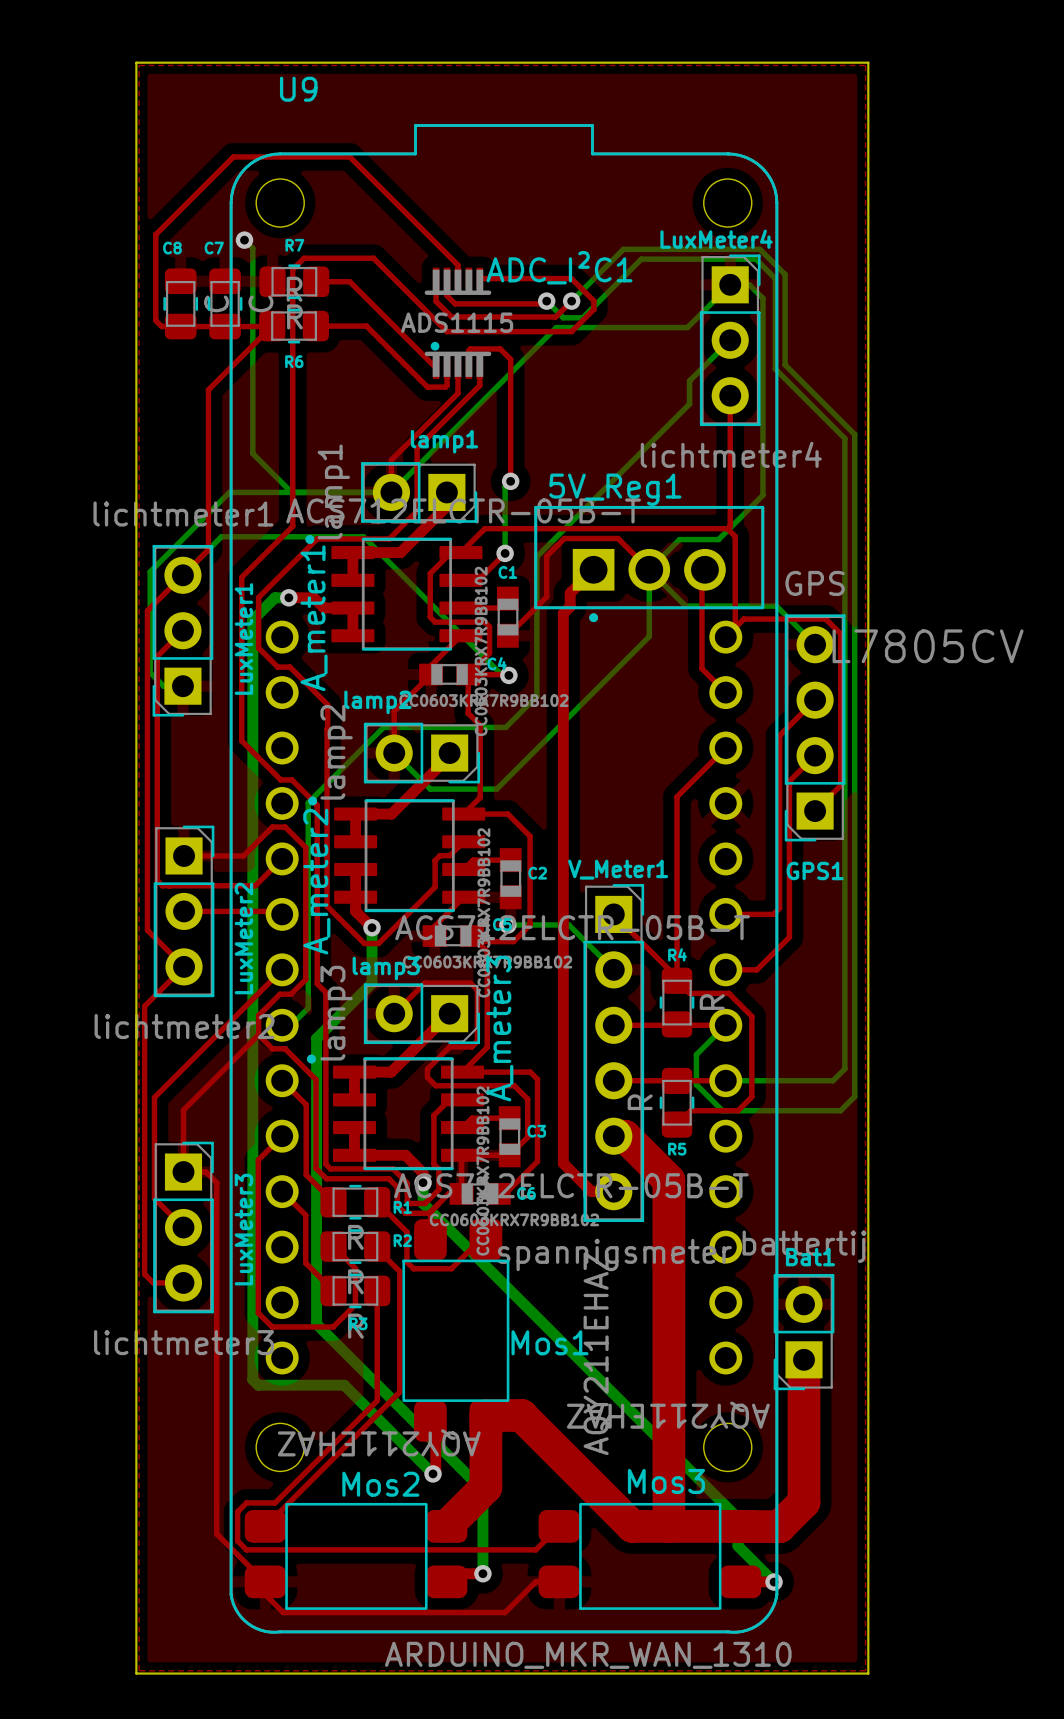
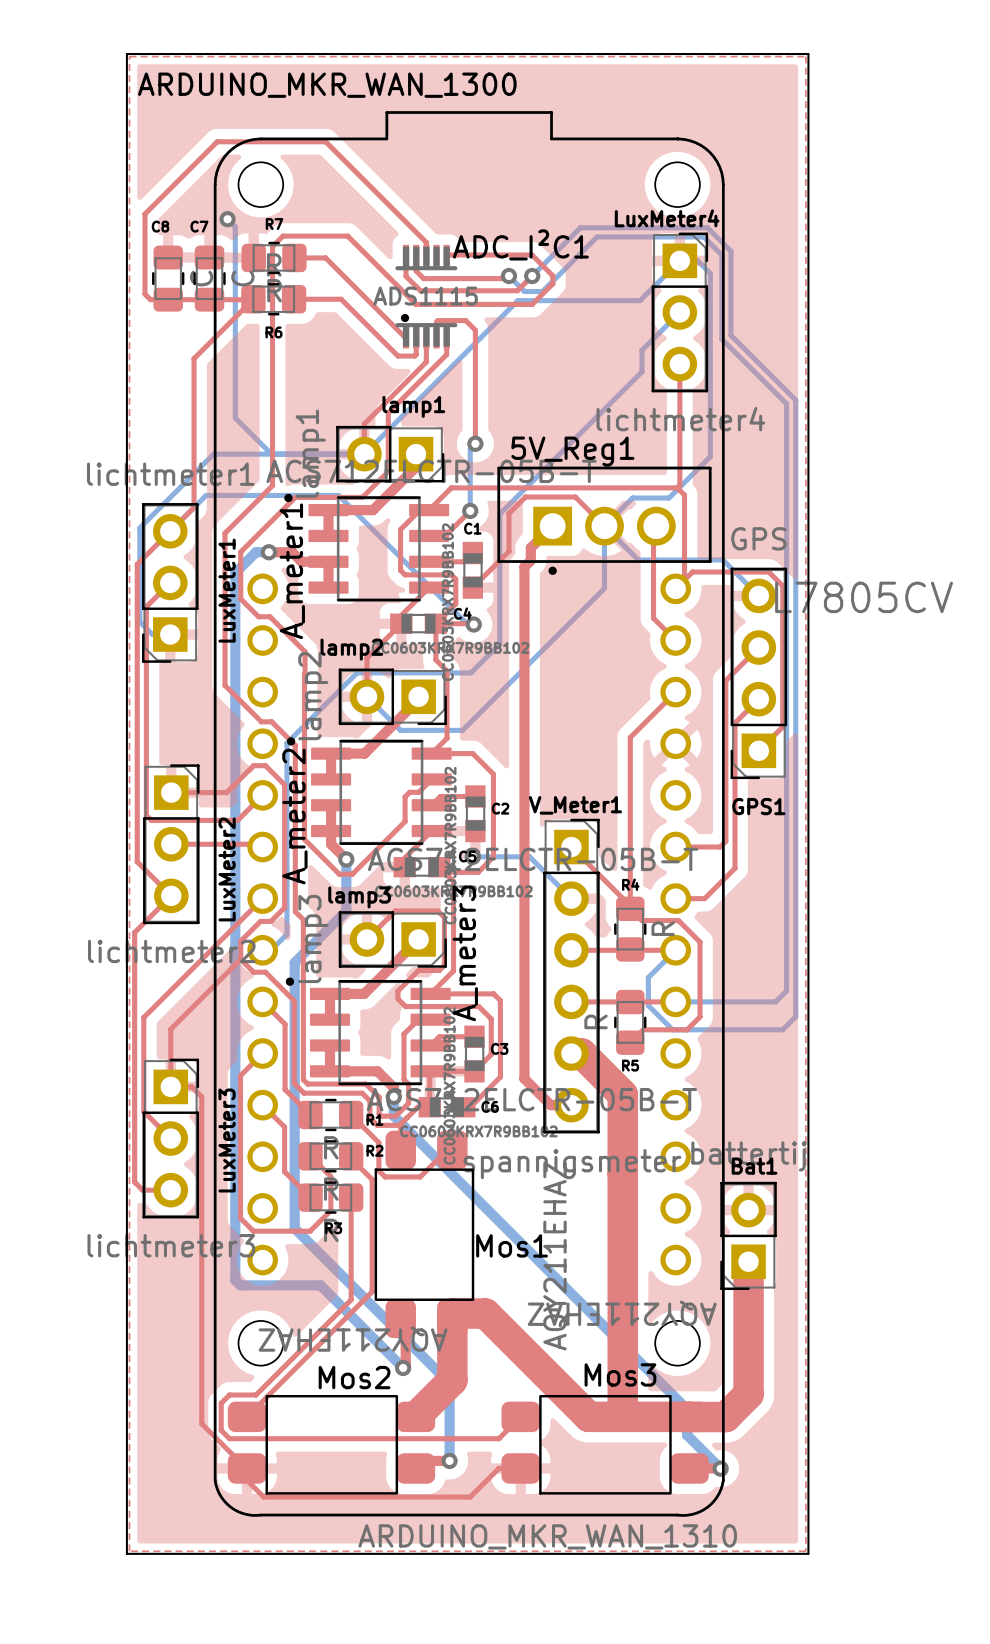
U9 name: U9 (298, 89) -> ARDUINO_MKR_WAN_1300 (327, 85)

